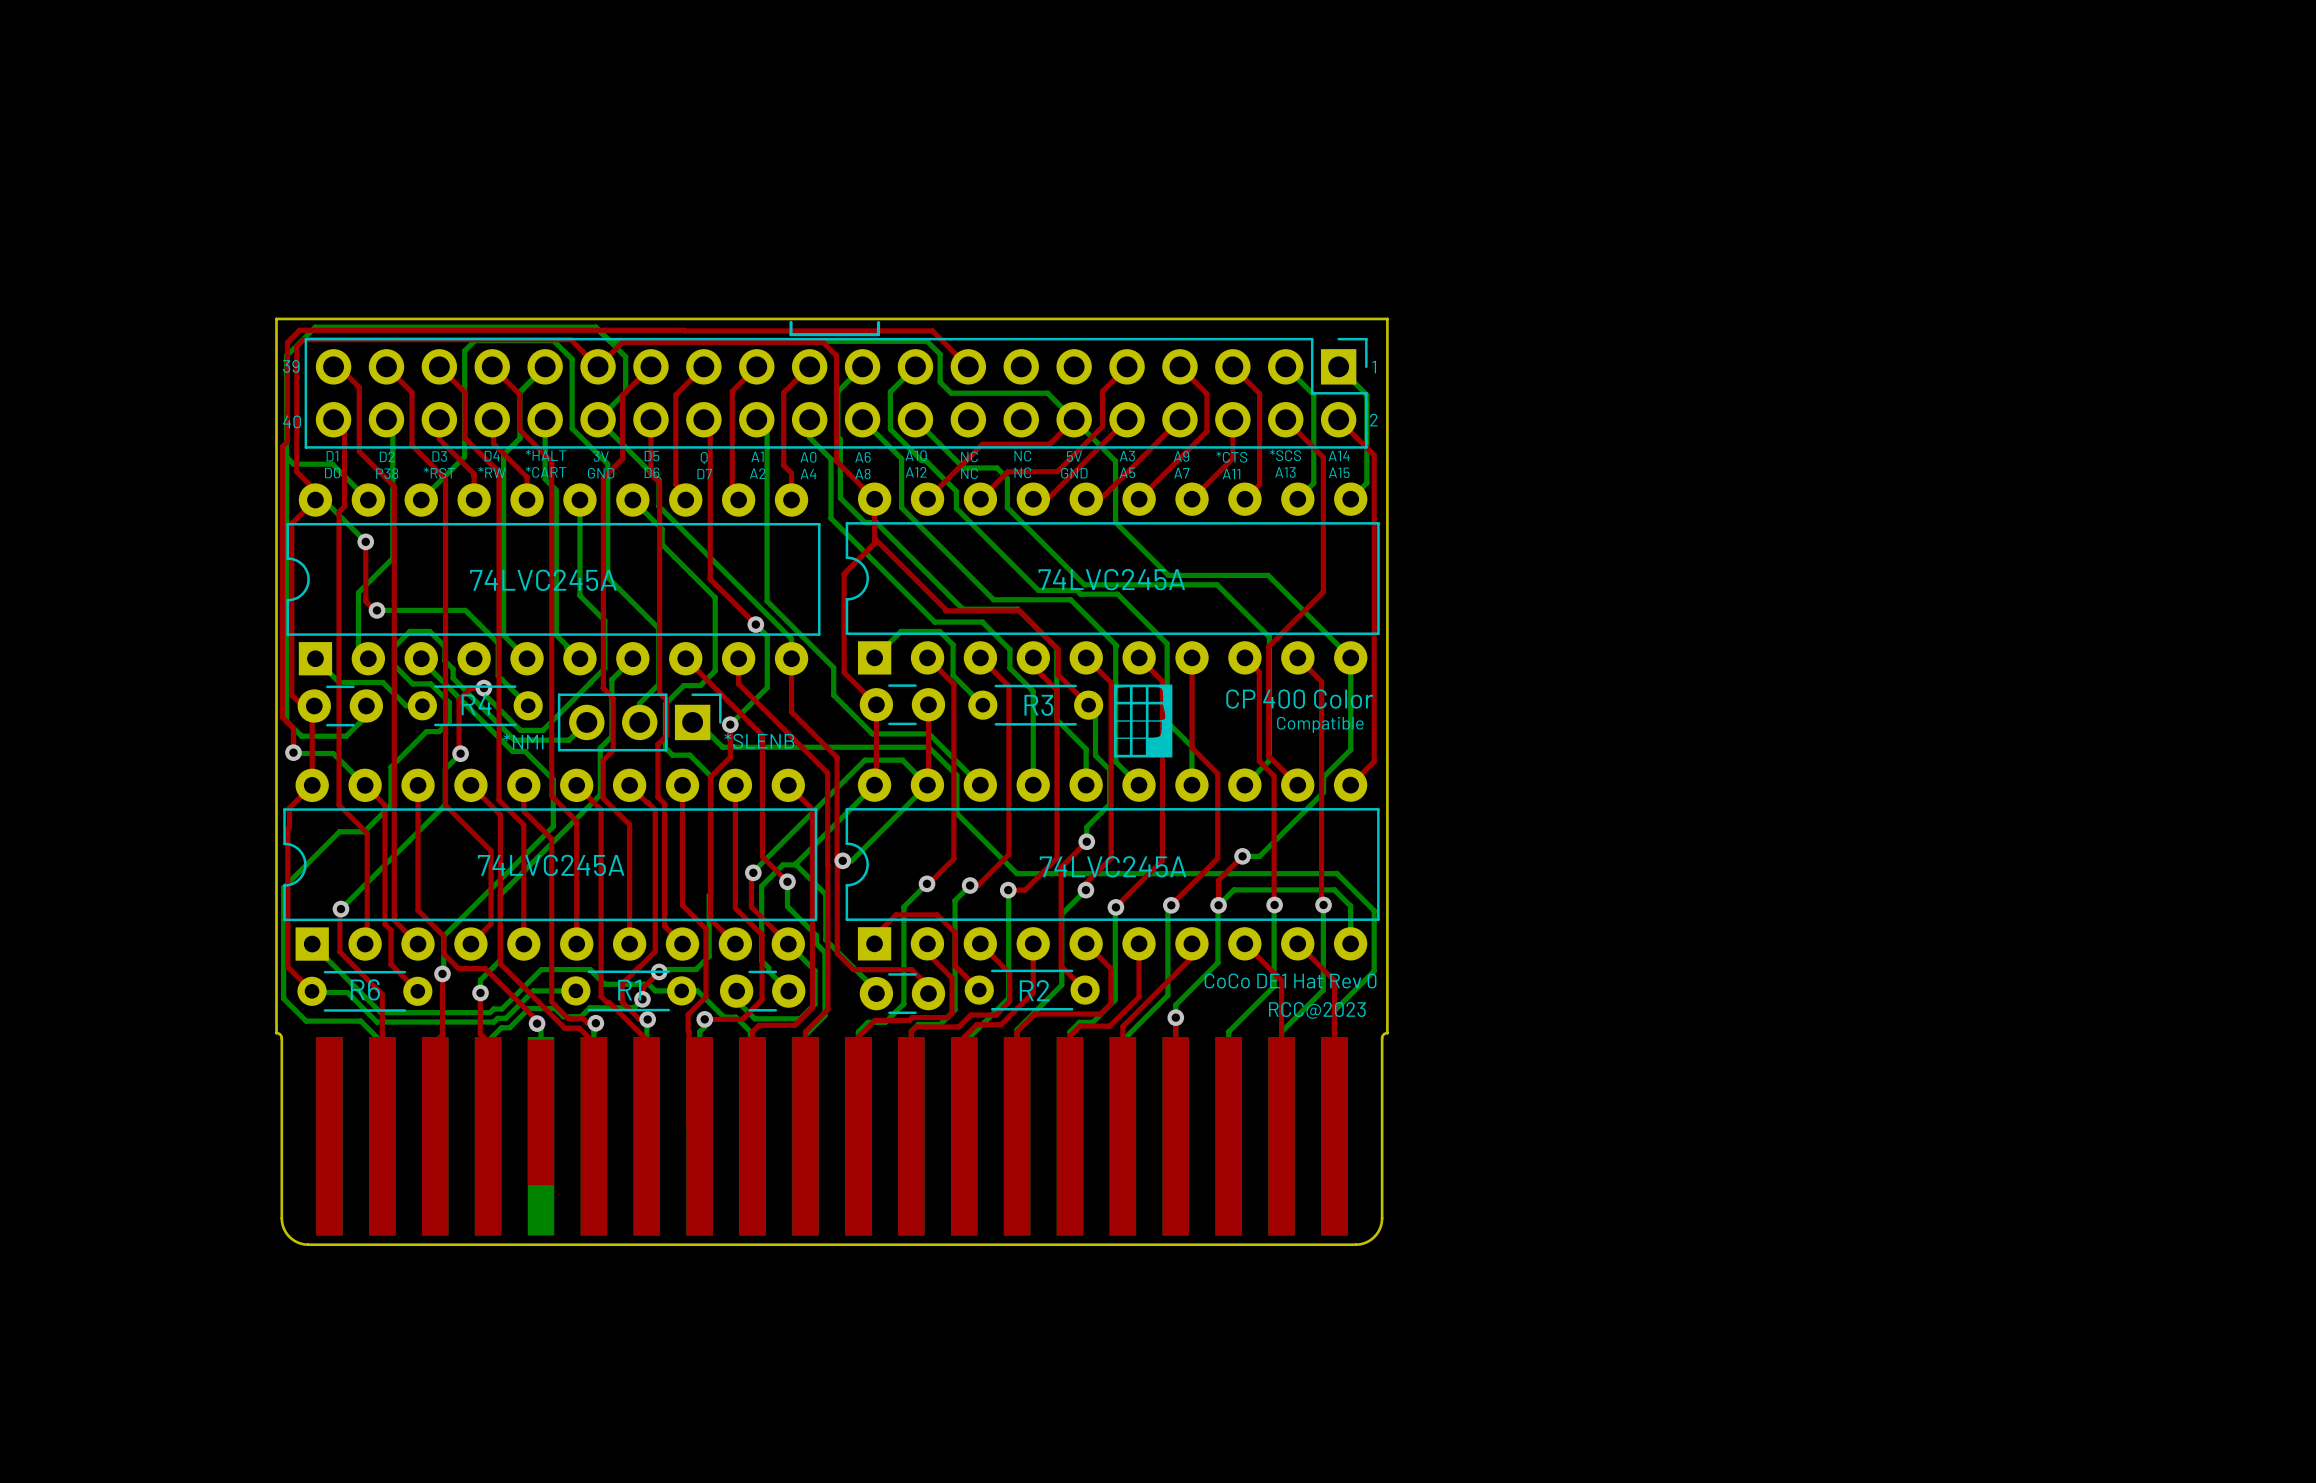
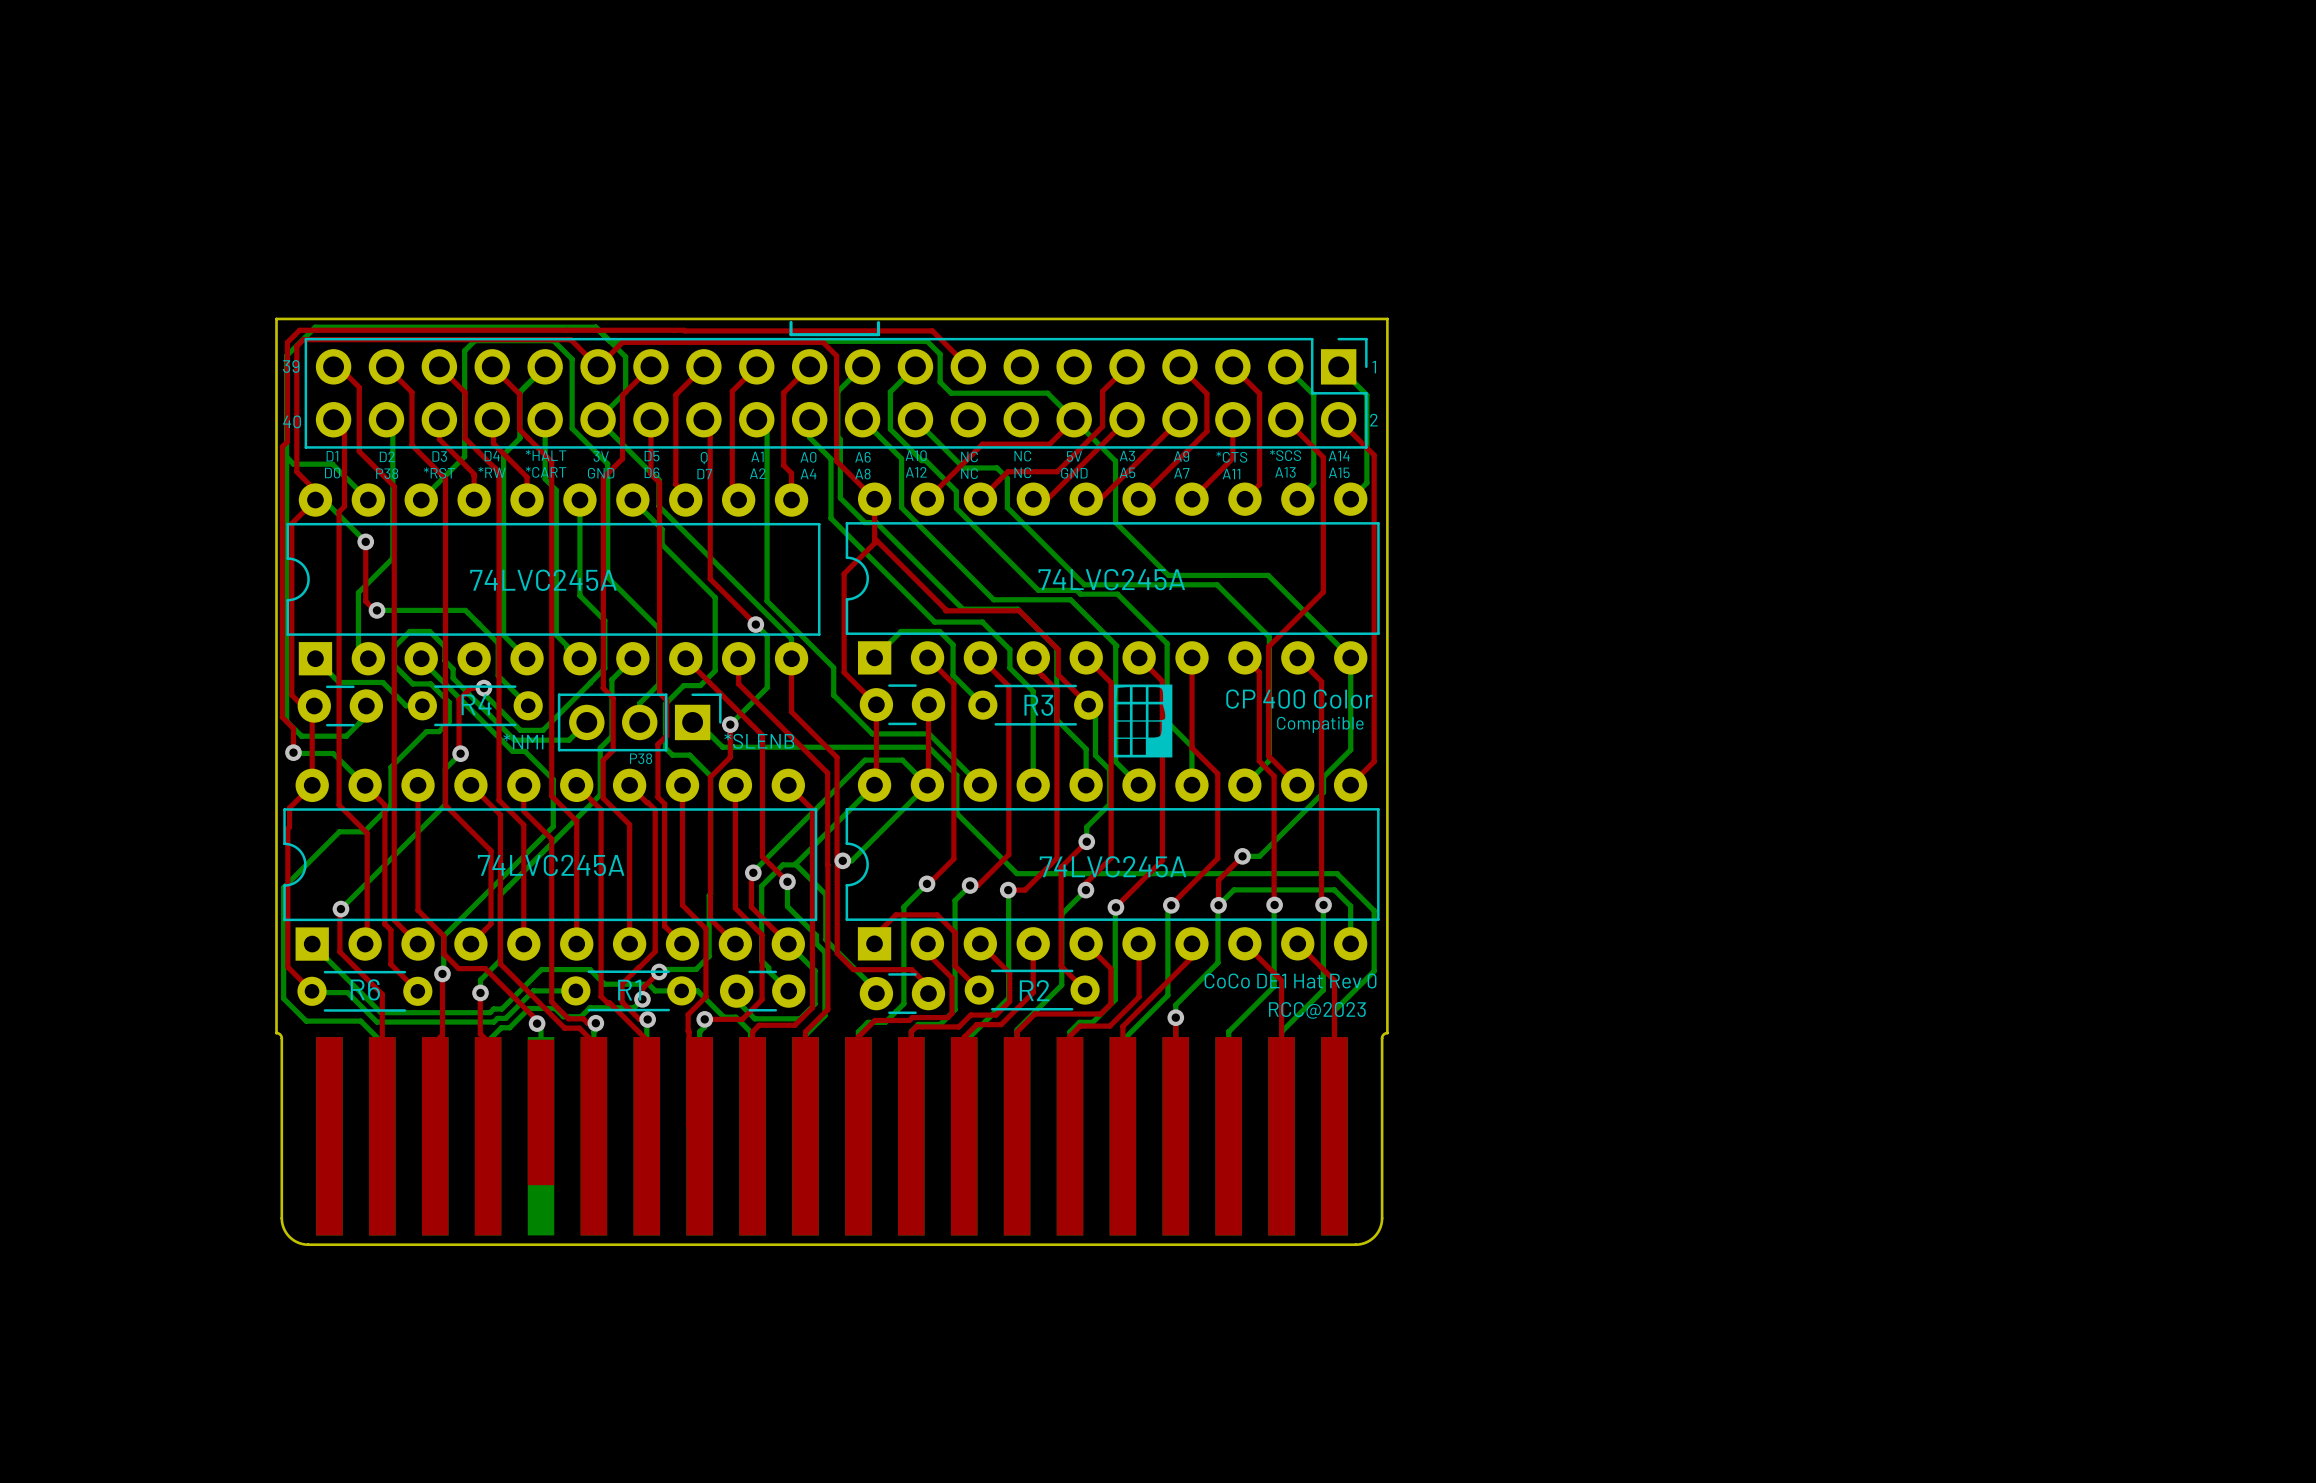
text: none -> P38 (641, 758)

